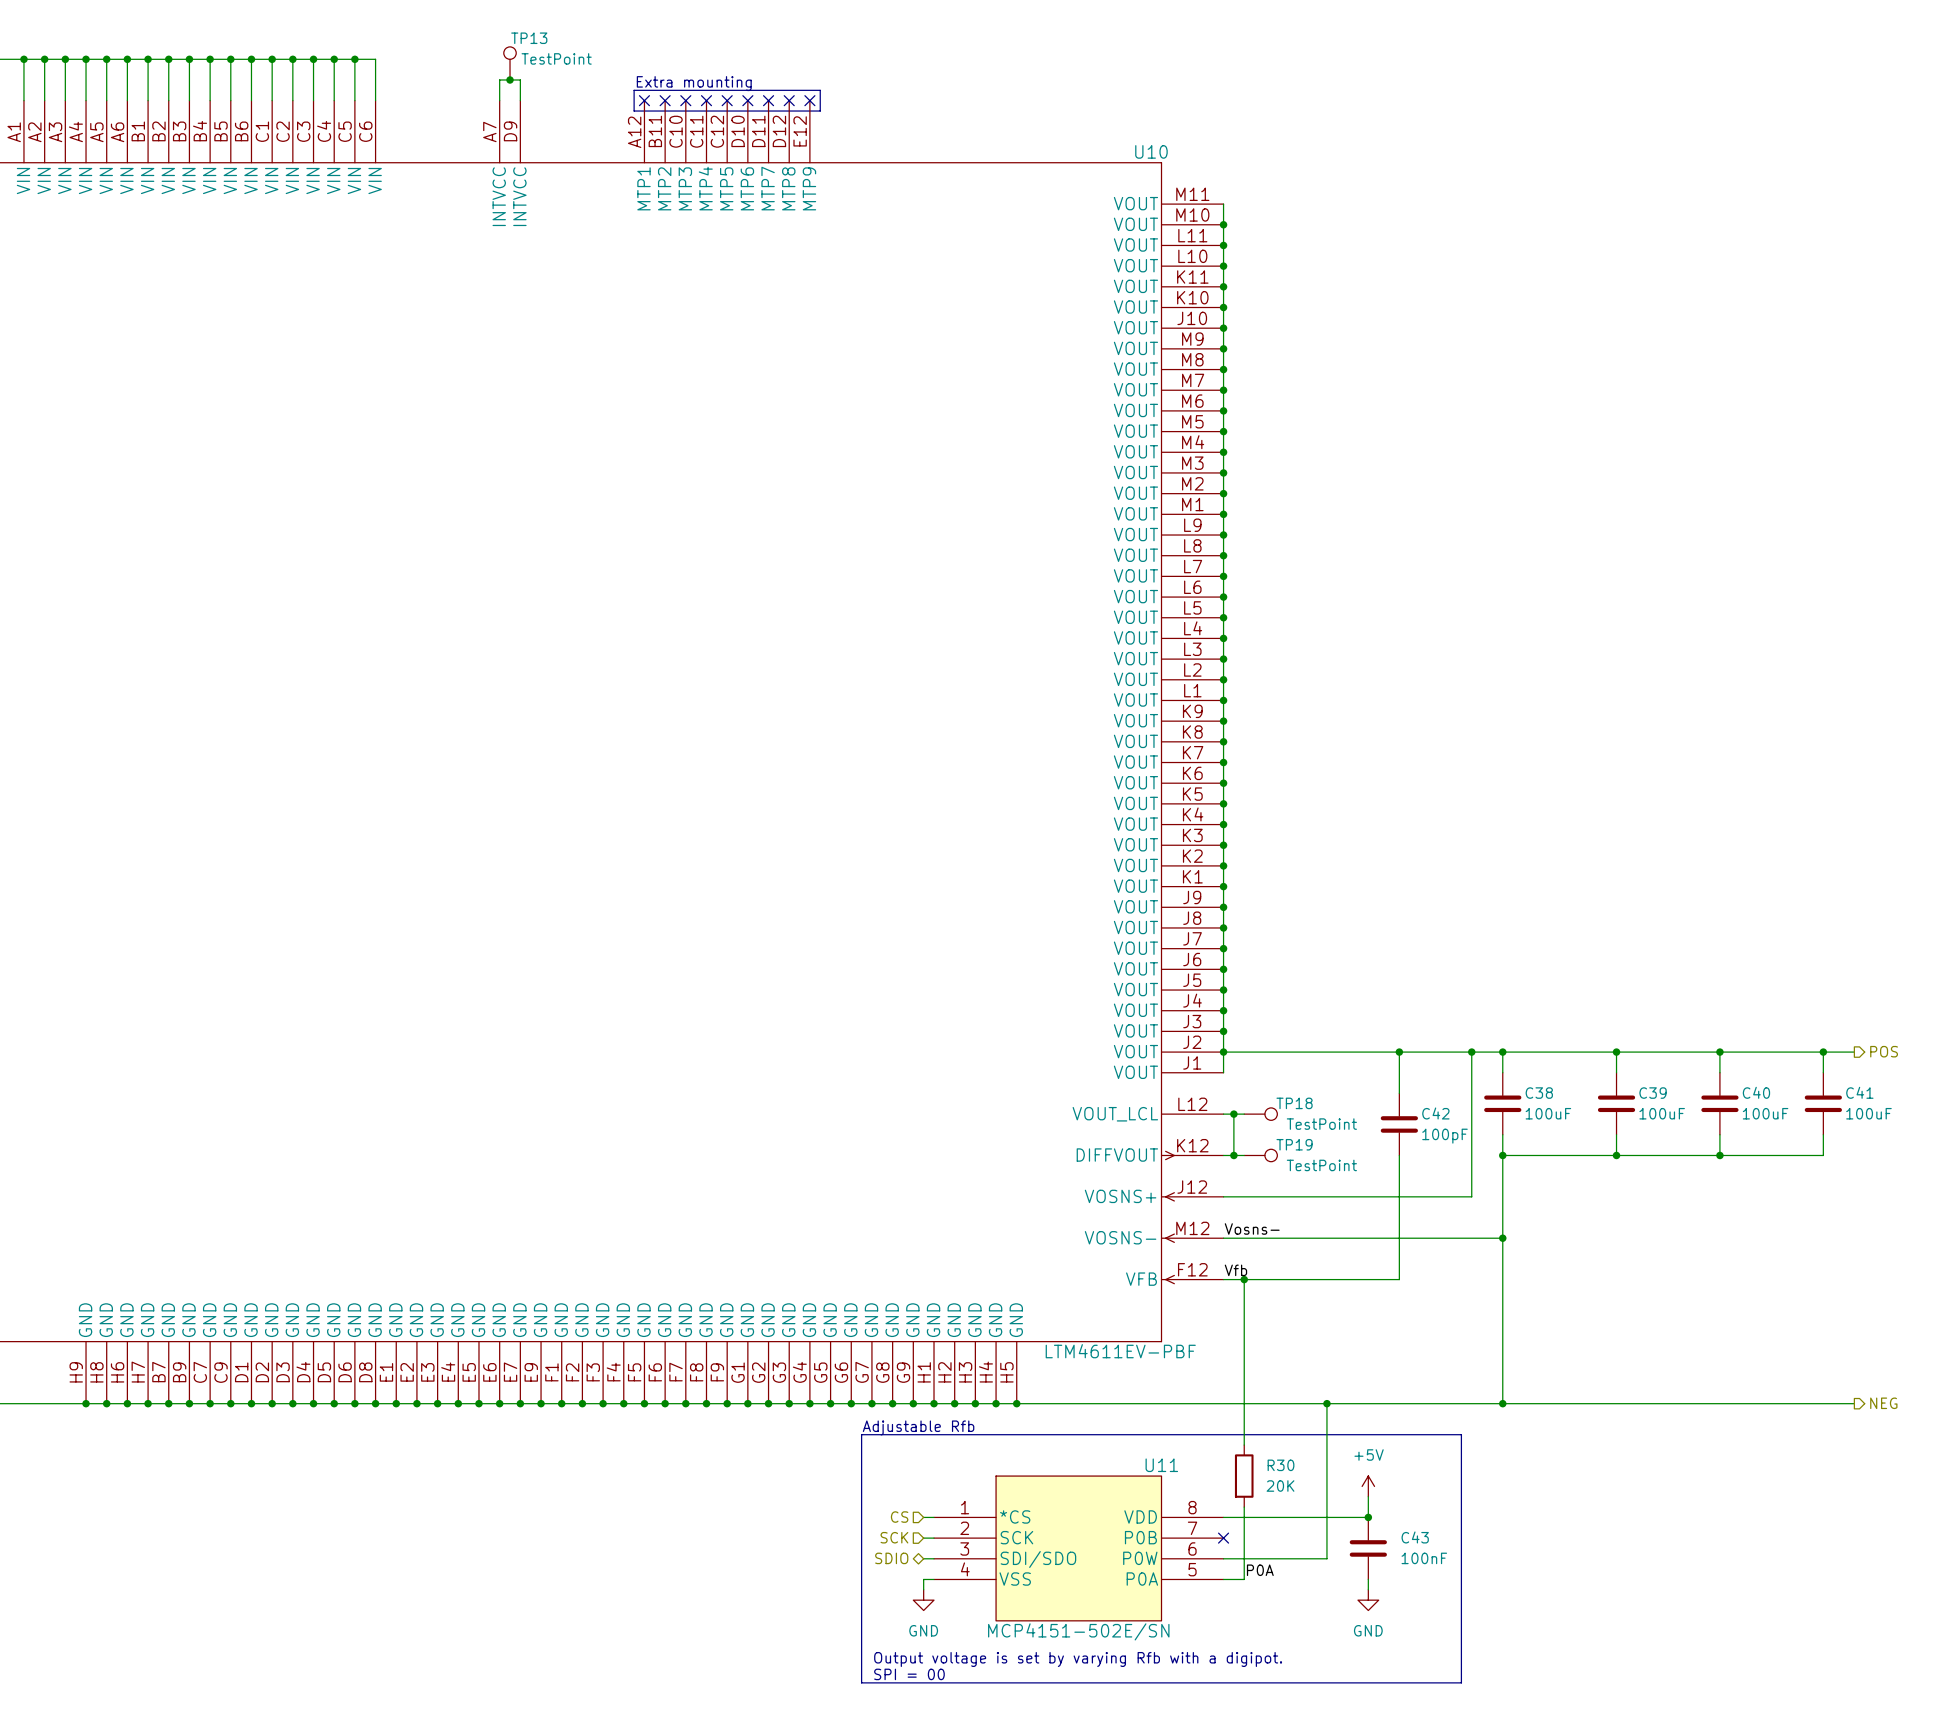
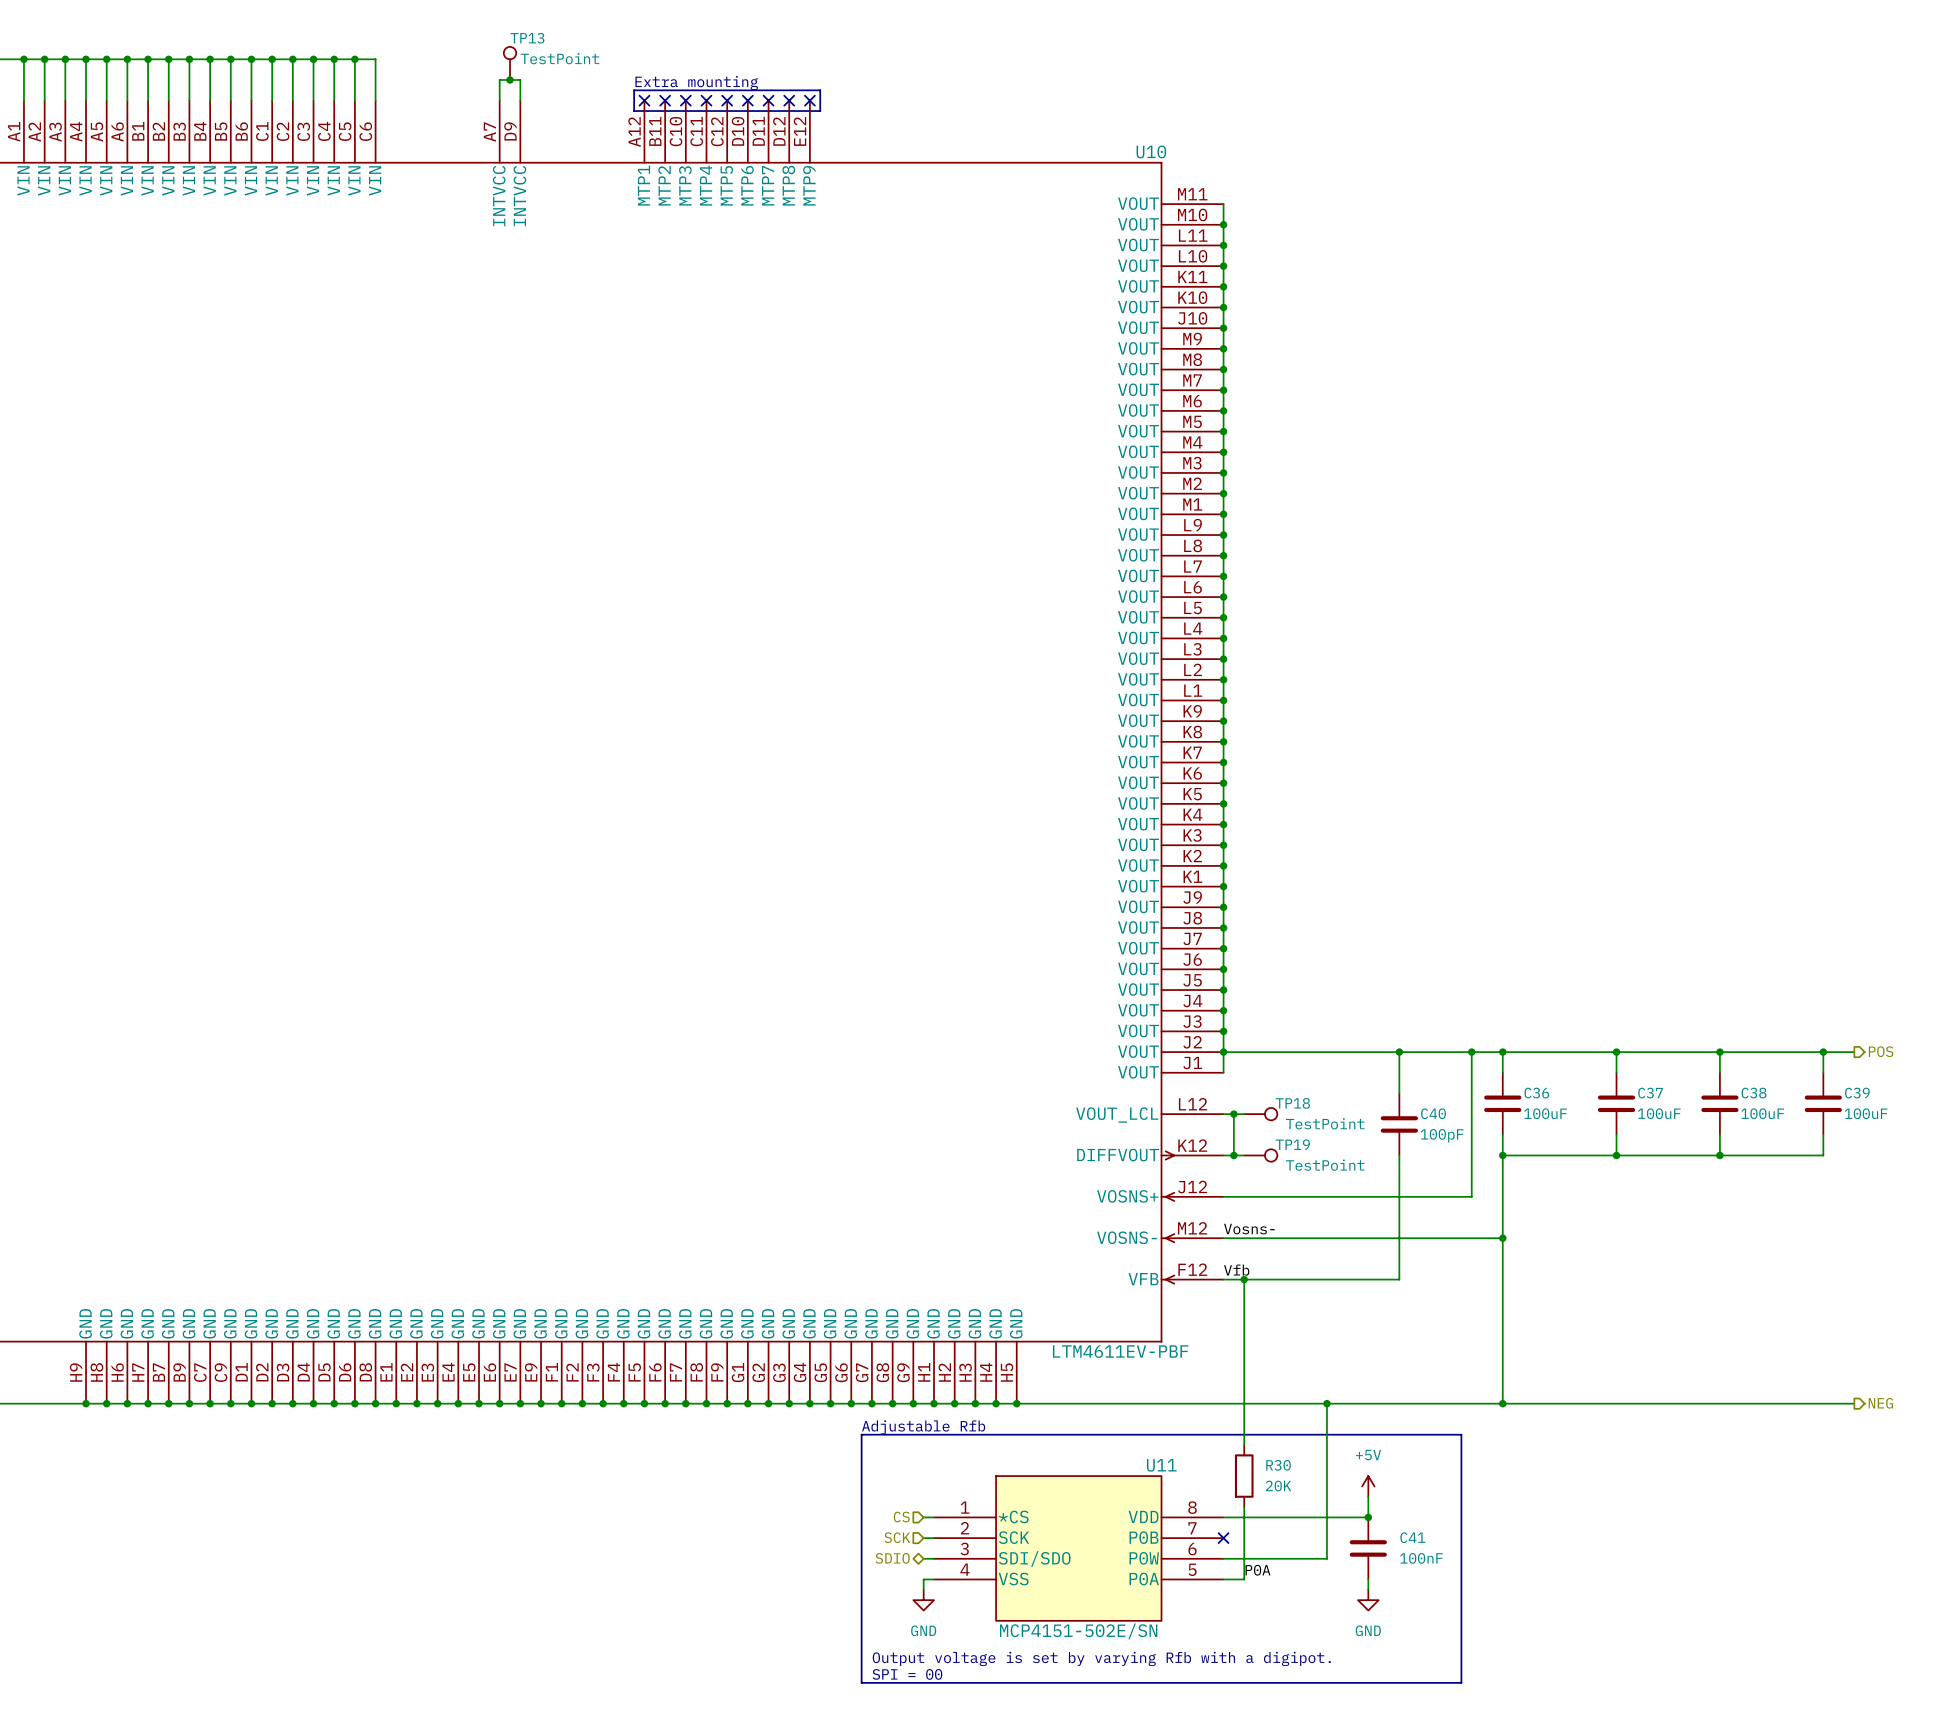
C40 name: C40 (1756, 1092) -> C38 (1754, 1093)
C41 name: C41 (1859, 1092) -> C39 (1857, 1093)
C38 name: C38 (1539, 1093) -> C36 (1536, 1093)
C39 name: C39 (1653, 1093) -> C37 (1650, 1093)
C42 name: C42 (1435, 1113) -> C40 (1433, 1113)
C43 name: C43 (1415, 1537) -> C41 (1412, 1537)

